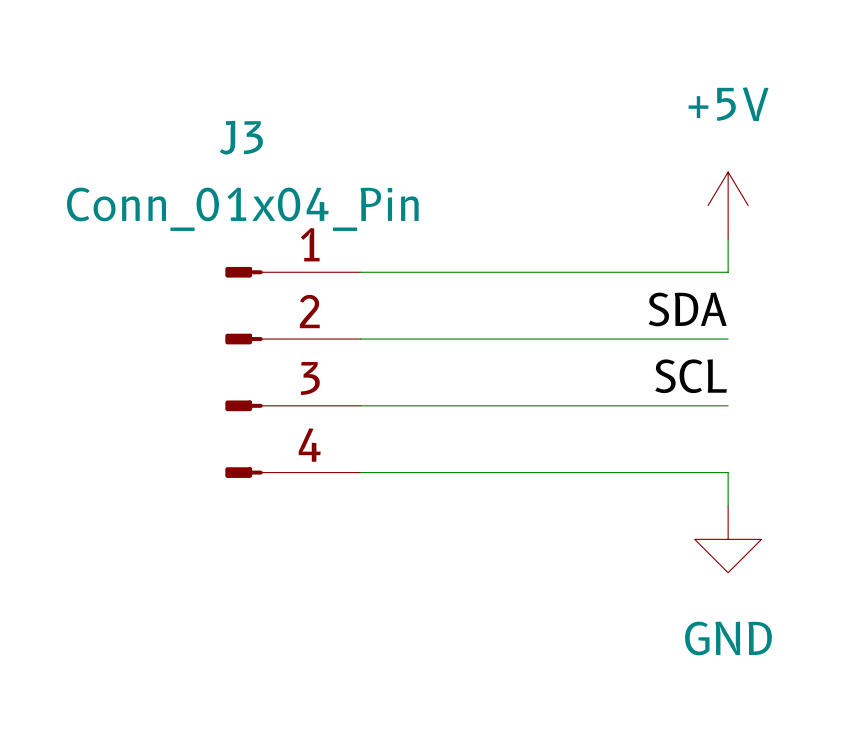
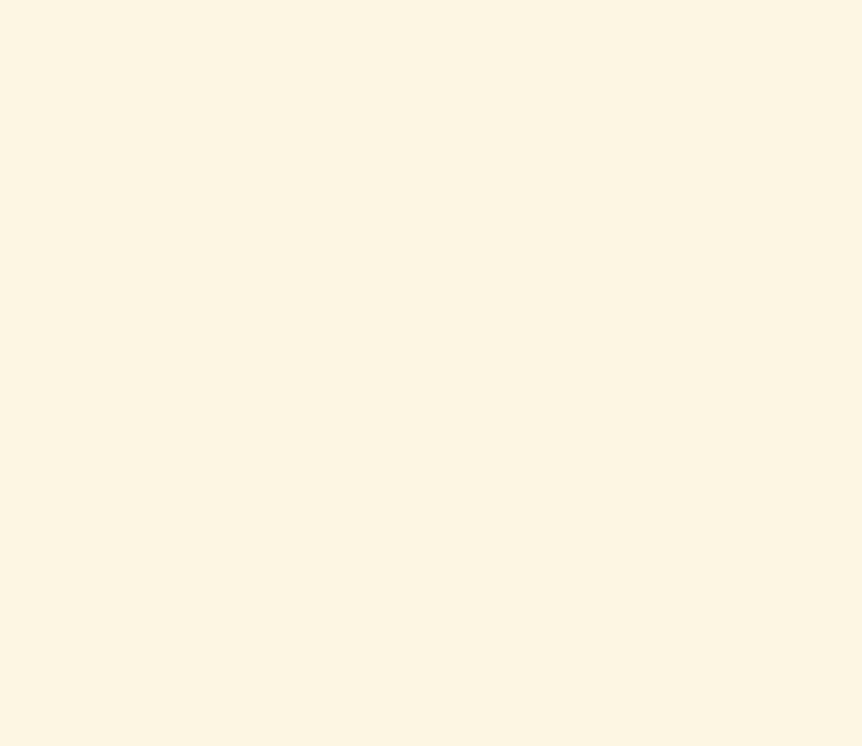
power symbol: +5V (728, 205) -> none
wire: (728, 238) (728, 272) (360, 272) -> none
label: SDA (687, 309) -> none
wire: (360, 339) (728, 339) -> none
J3: Conn_01x04_Pin (293, 372) -> none
label: SCL (691, 376) -> none
wire: (360, 405) (728, 405) -> none
wire: (360, 472) (728, 472) (728, 505) -> none
power symbol: GND (728, 539) -> none

